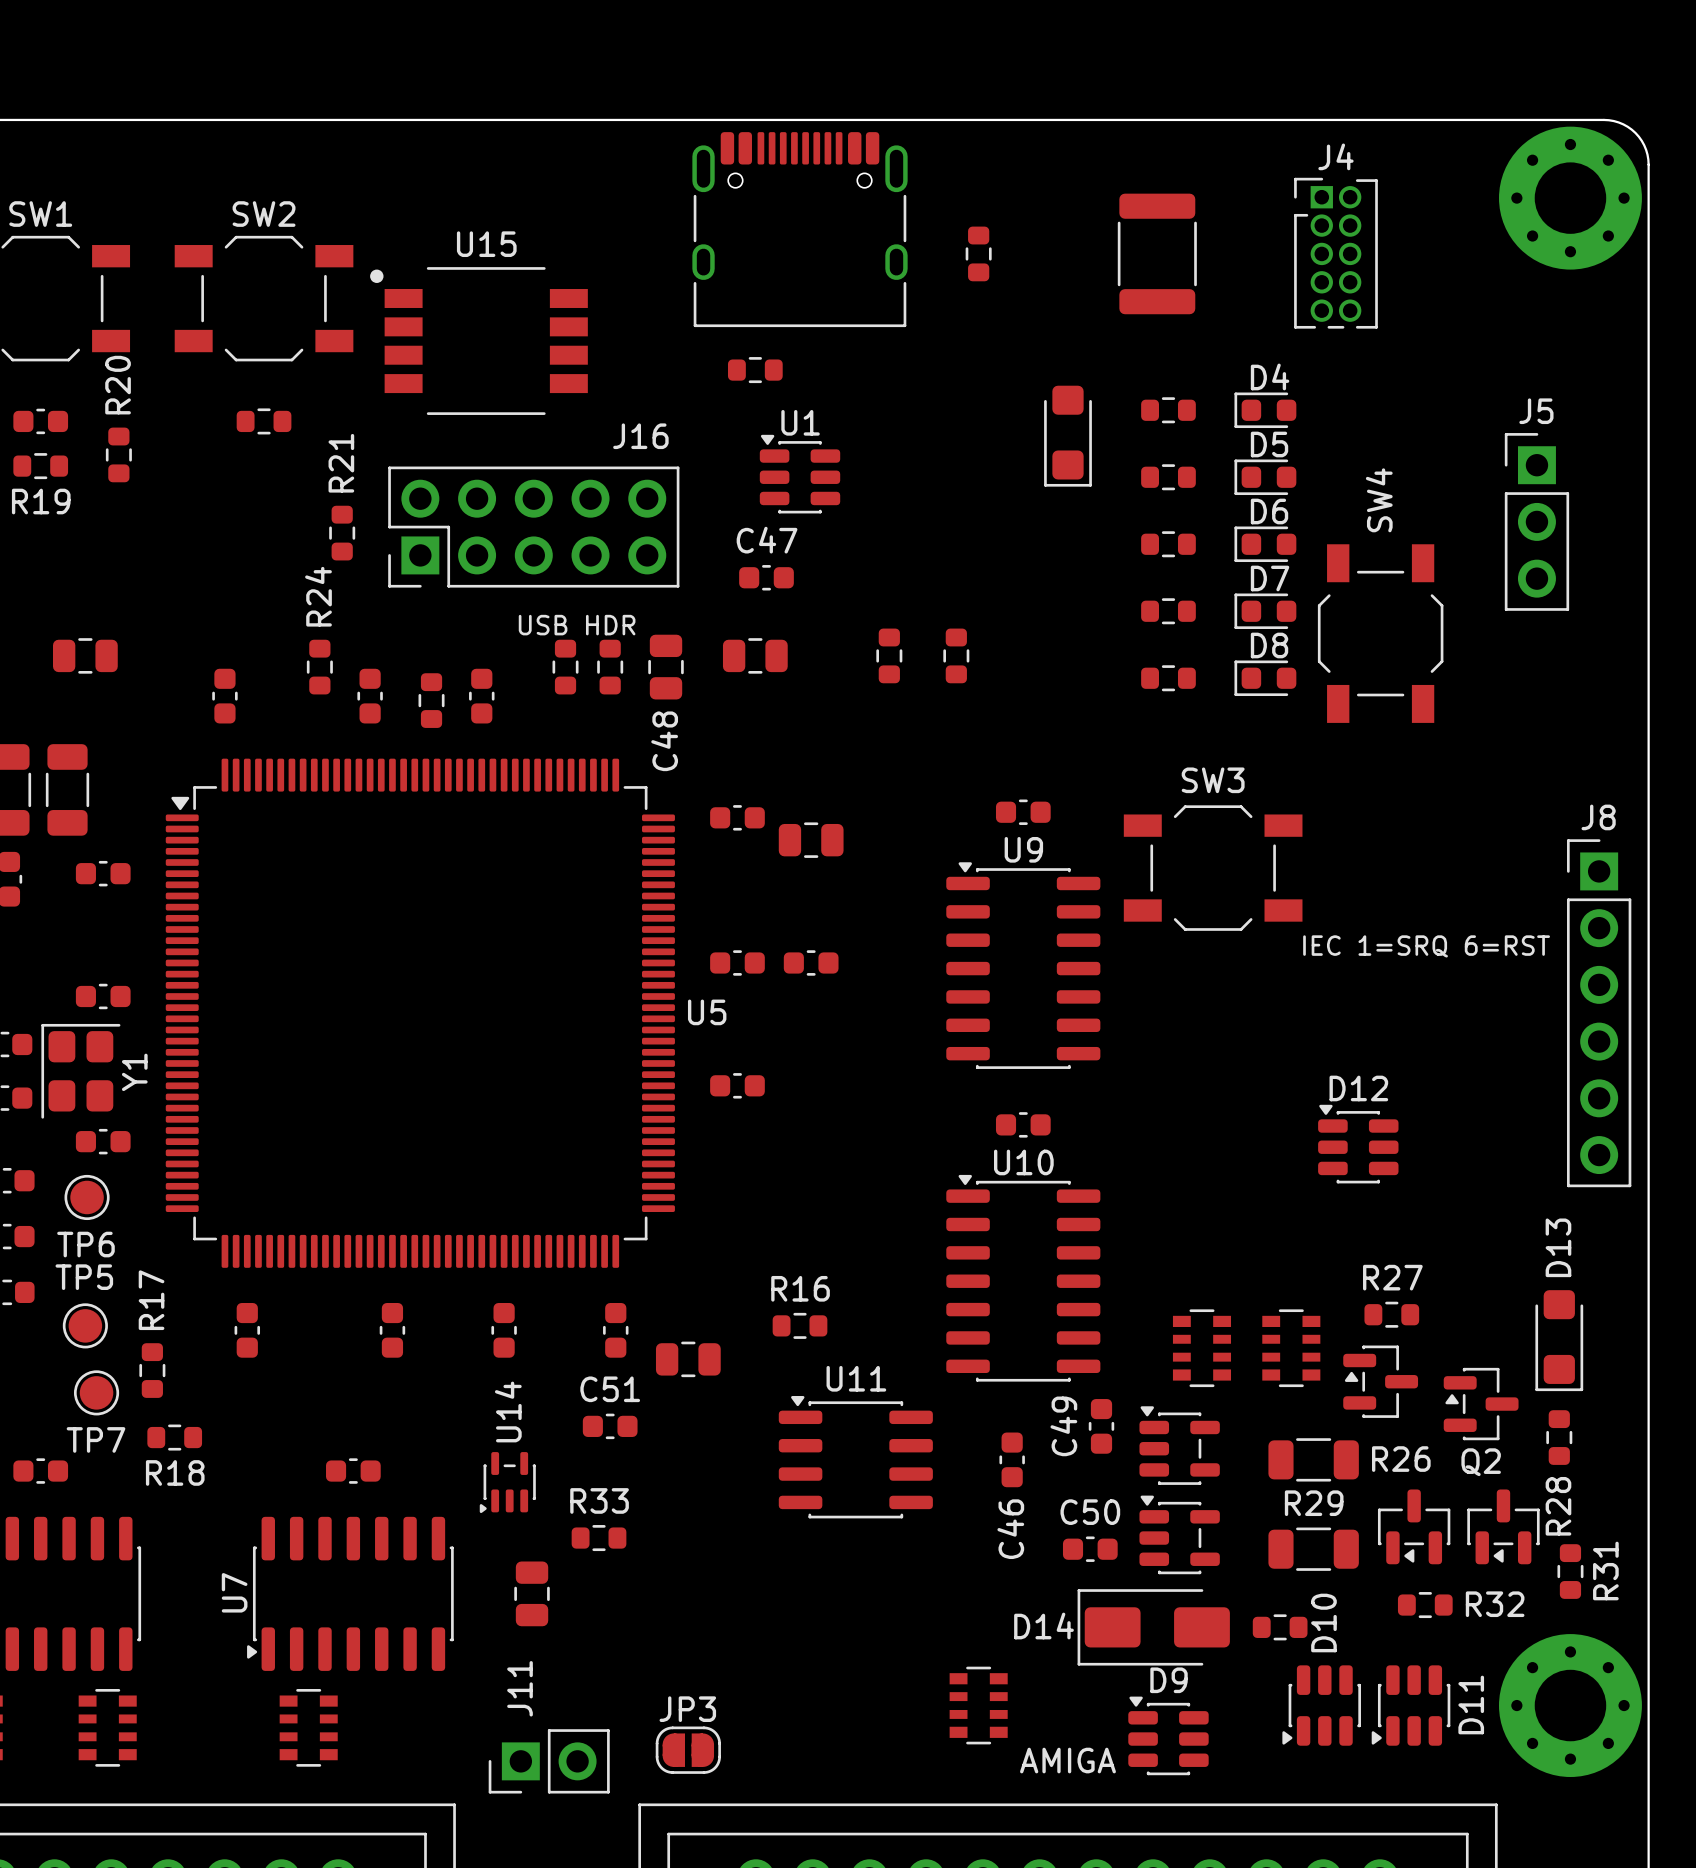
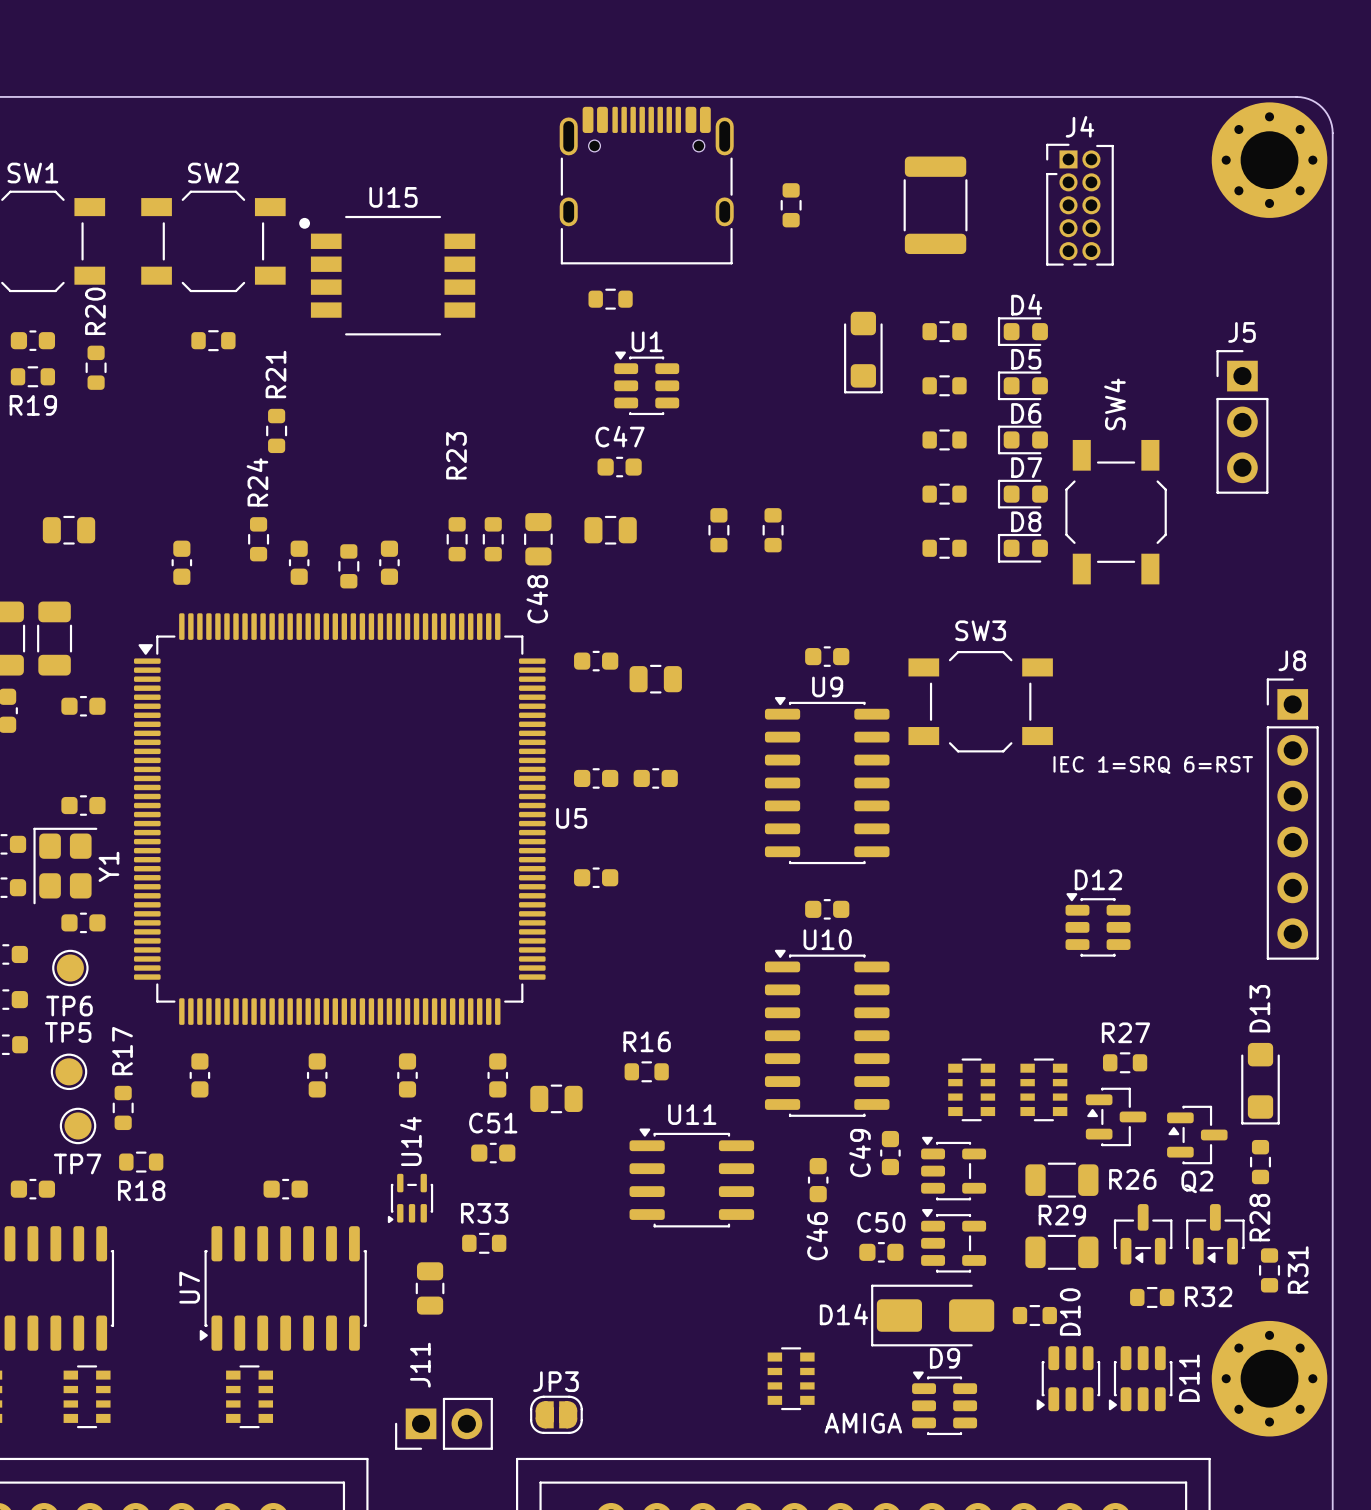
J16: (533, 527) -> none
R23 name: none -> R23 (456, 455)
text: USB HDR (577, 625) -> none

